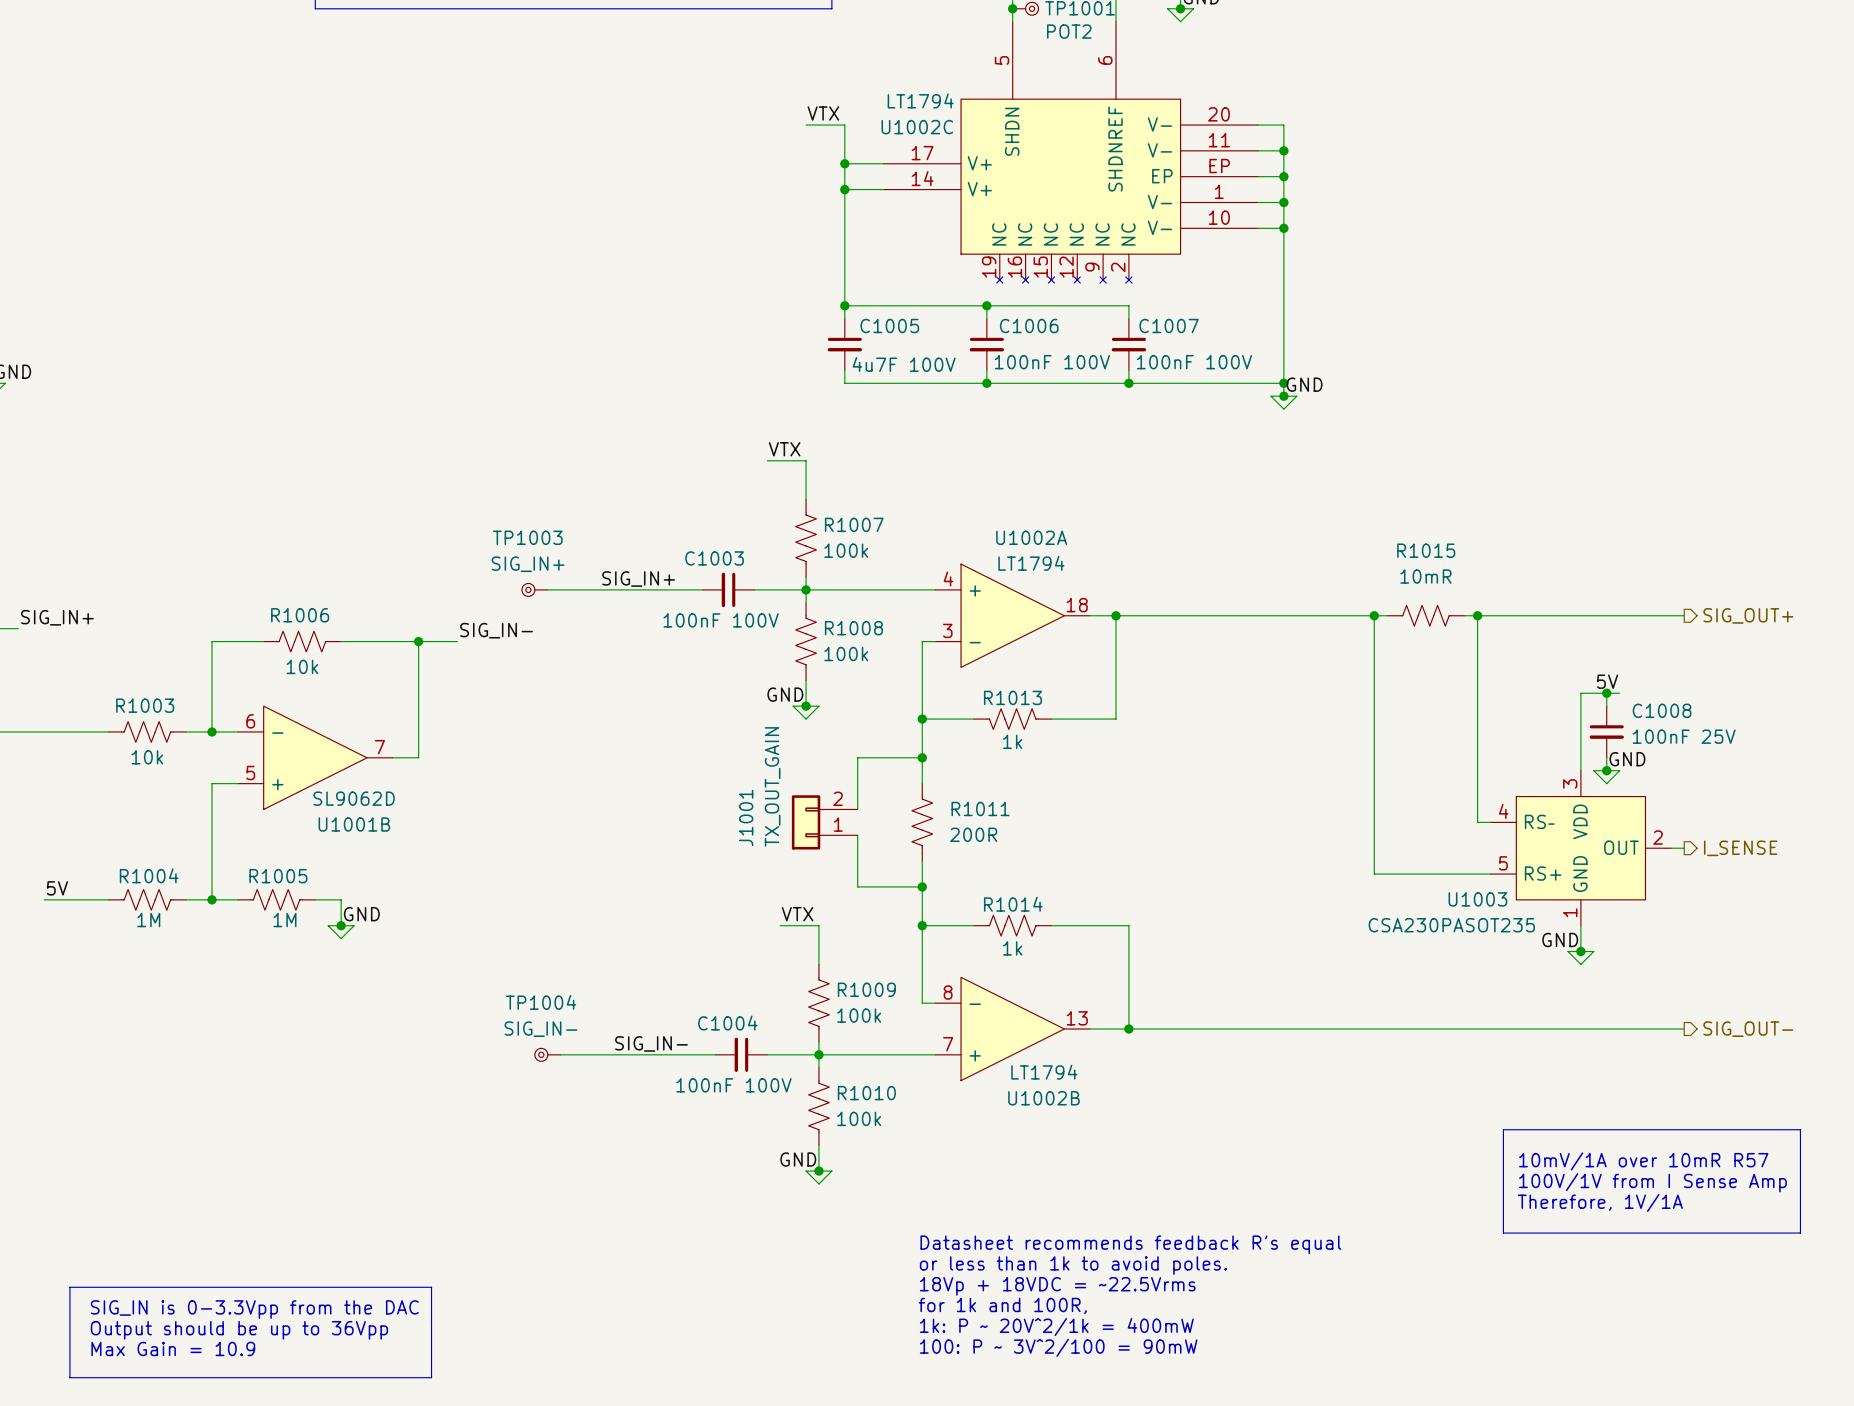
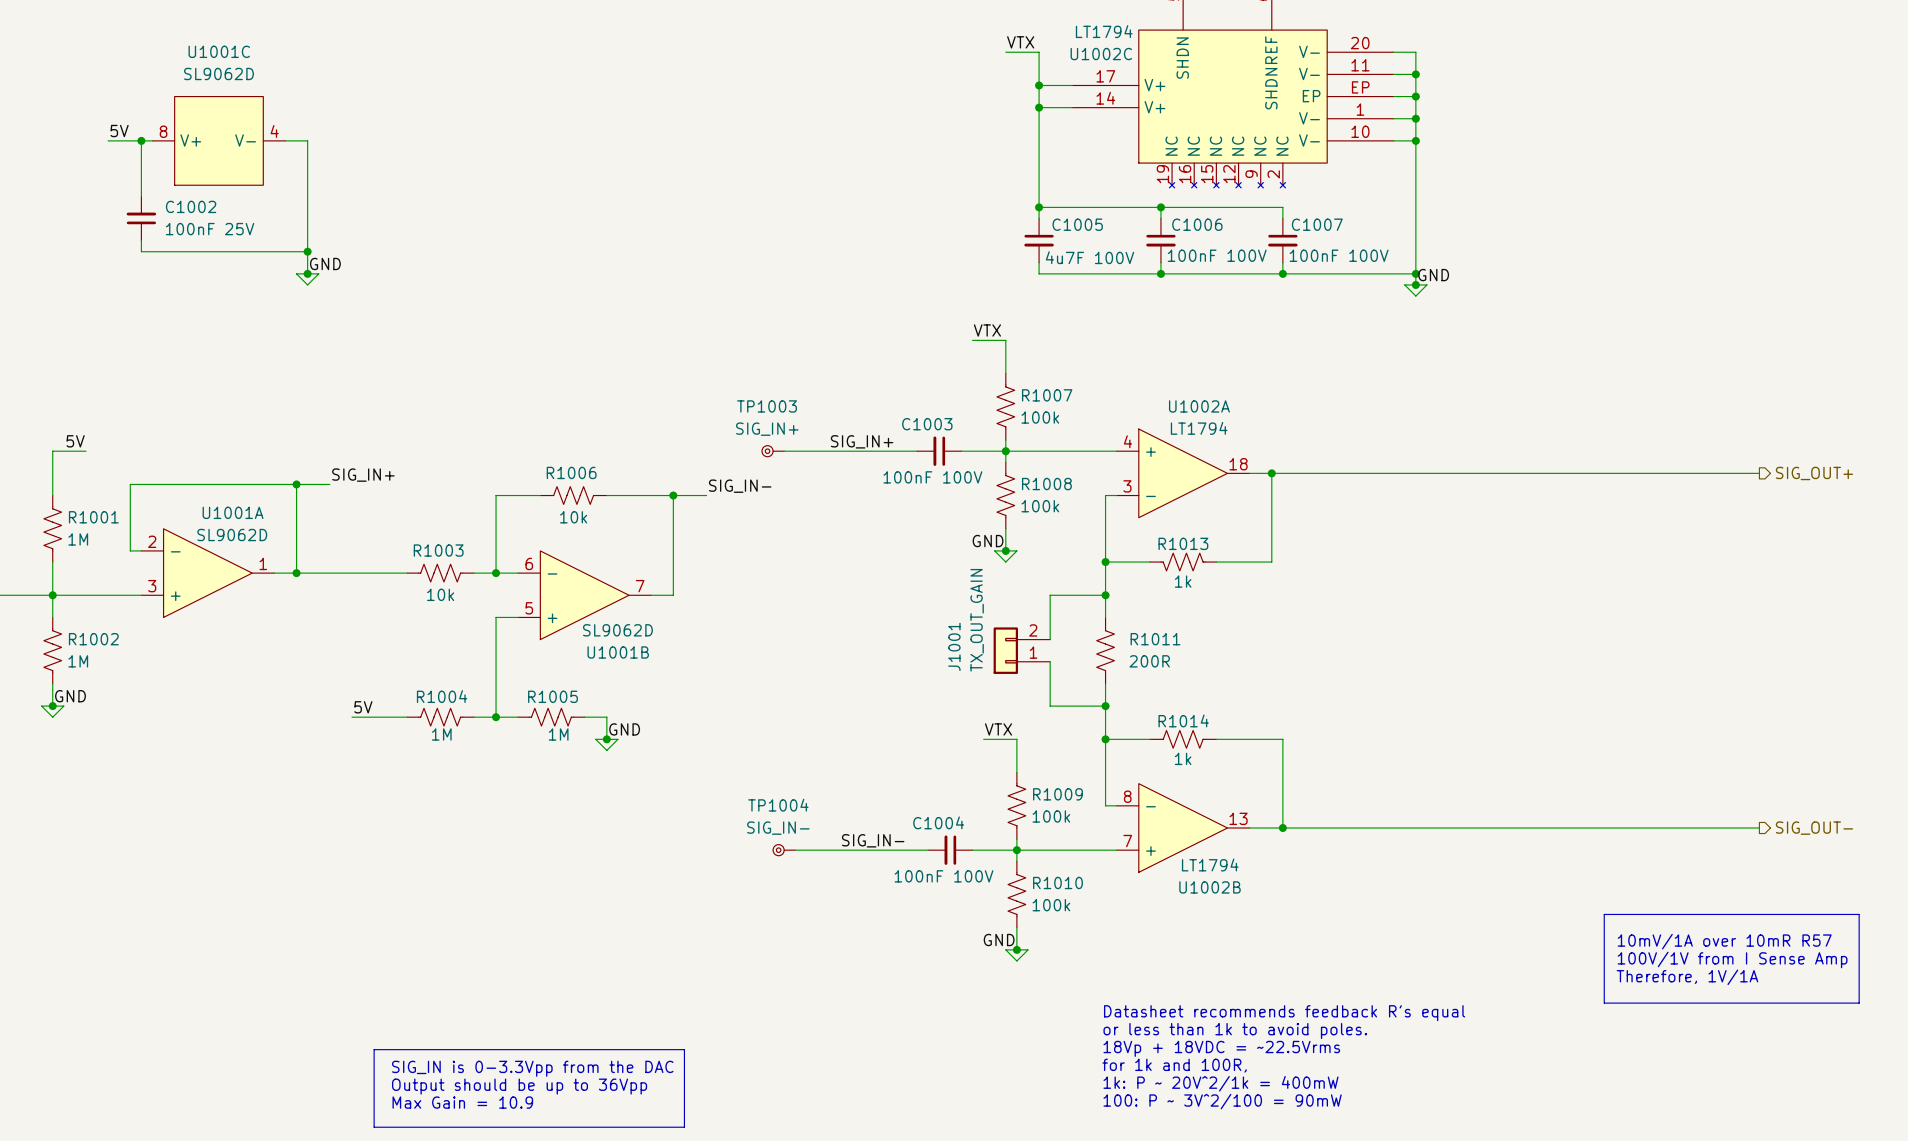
wire: (1374, 615) (1374, 874) (1490, 874) -> none
junction: (1374, 615) -> none
R1015: 10mR (1425, 615) -> none
wire: (1477, 615) (1477, 822) (1490, 822) -> none
junction: (1477, 615) -> none
label: 5V (1607, 681) -> none
wire: (1606, 693) (1606, 706) -> none
junction: (1606, 693) -> none
wire: (1619, 693) (1580, 693) (1580, 770) -> none
C1008: 100nF 25V (1606, 731) -> none
wire: (1606, 757) (1606, 770) -> none
label: GND (1627, 759) -> none
wire: (1593, 770) (1619, 770) (1606, 783) (1593, 770) -> none
junction: (1606, 770) -> none
U1003: CSA230PASOT235 (1580, 848) -> none
wire: (1671, 848) (1684, 848) -> none
hierarchical label: I_SENSE (1740, 848) -> none
wire: (1580, 925) (1580, 951) -> none
label: GND (1560, 940) -> none
wire: (1567, 951) (1593, 951) (1580, 964) (1567, 951) -> none
junction: (1580, 951) -> none

